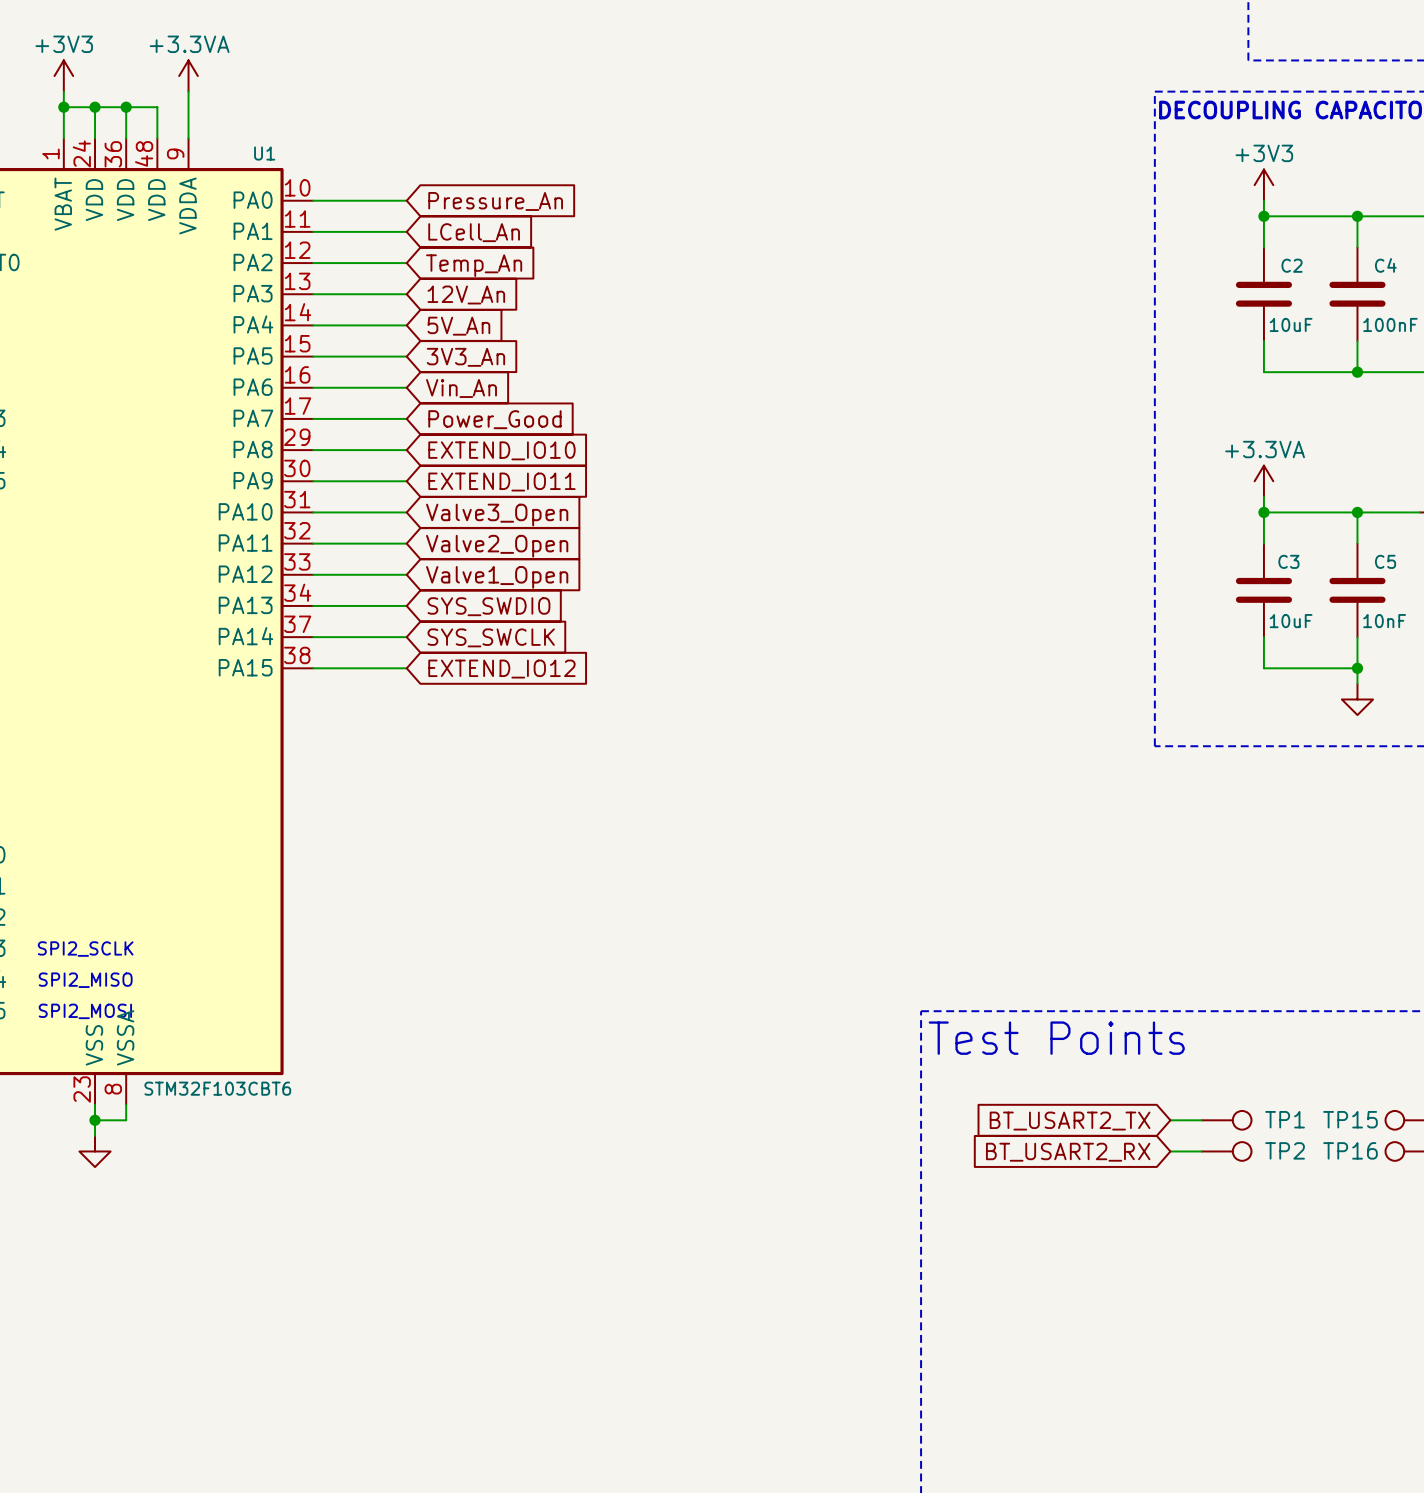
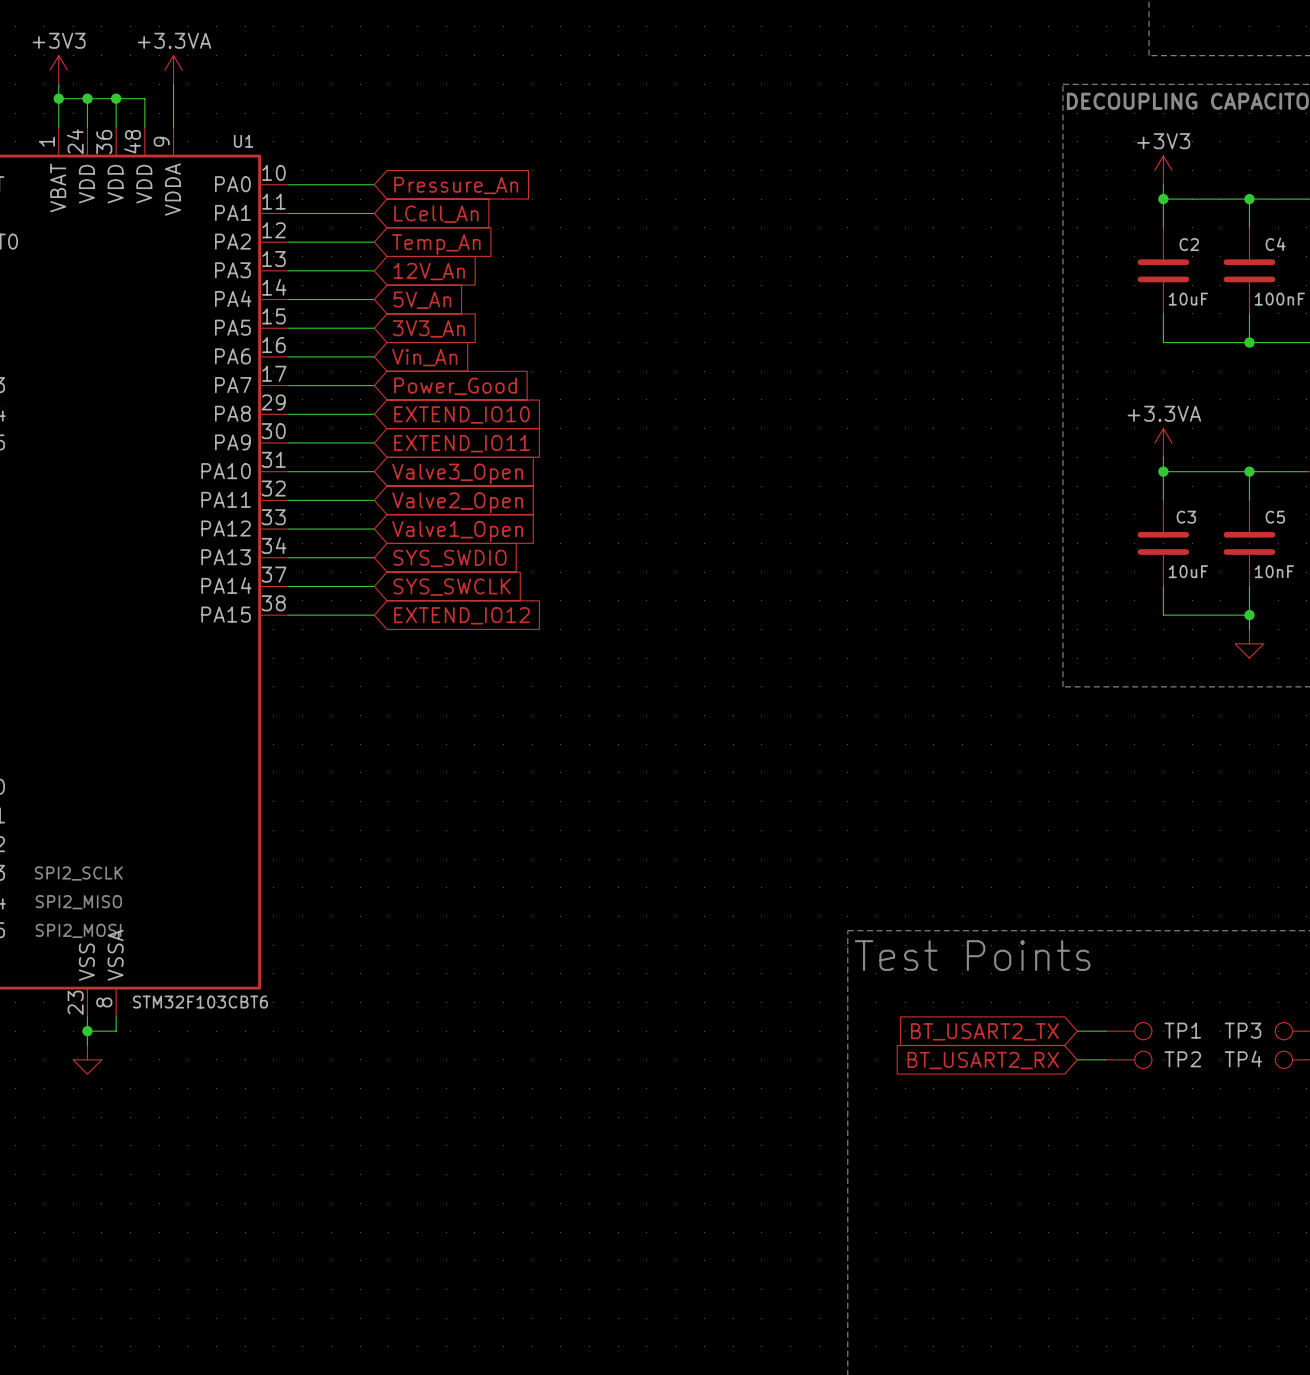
TP15 name: TP15 (1350, 1119) -> TP3 (1243, 1030)
TP16 name: TP16 (1350, 1150) -> TP4 (1243, 1058)

